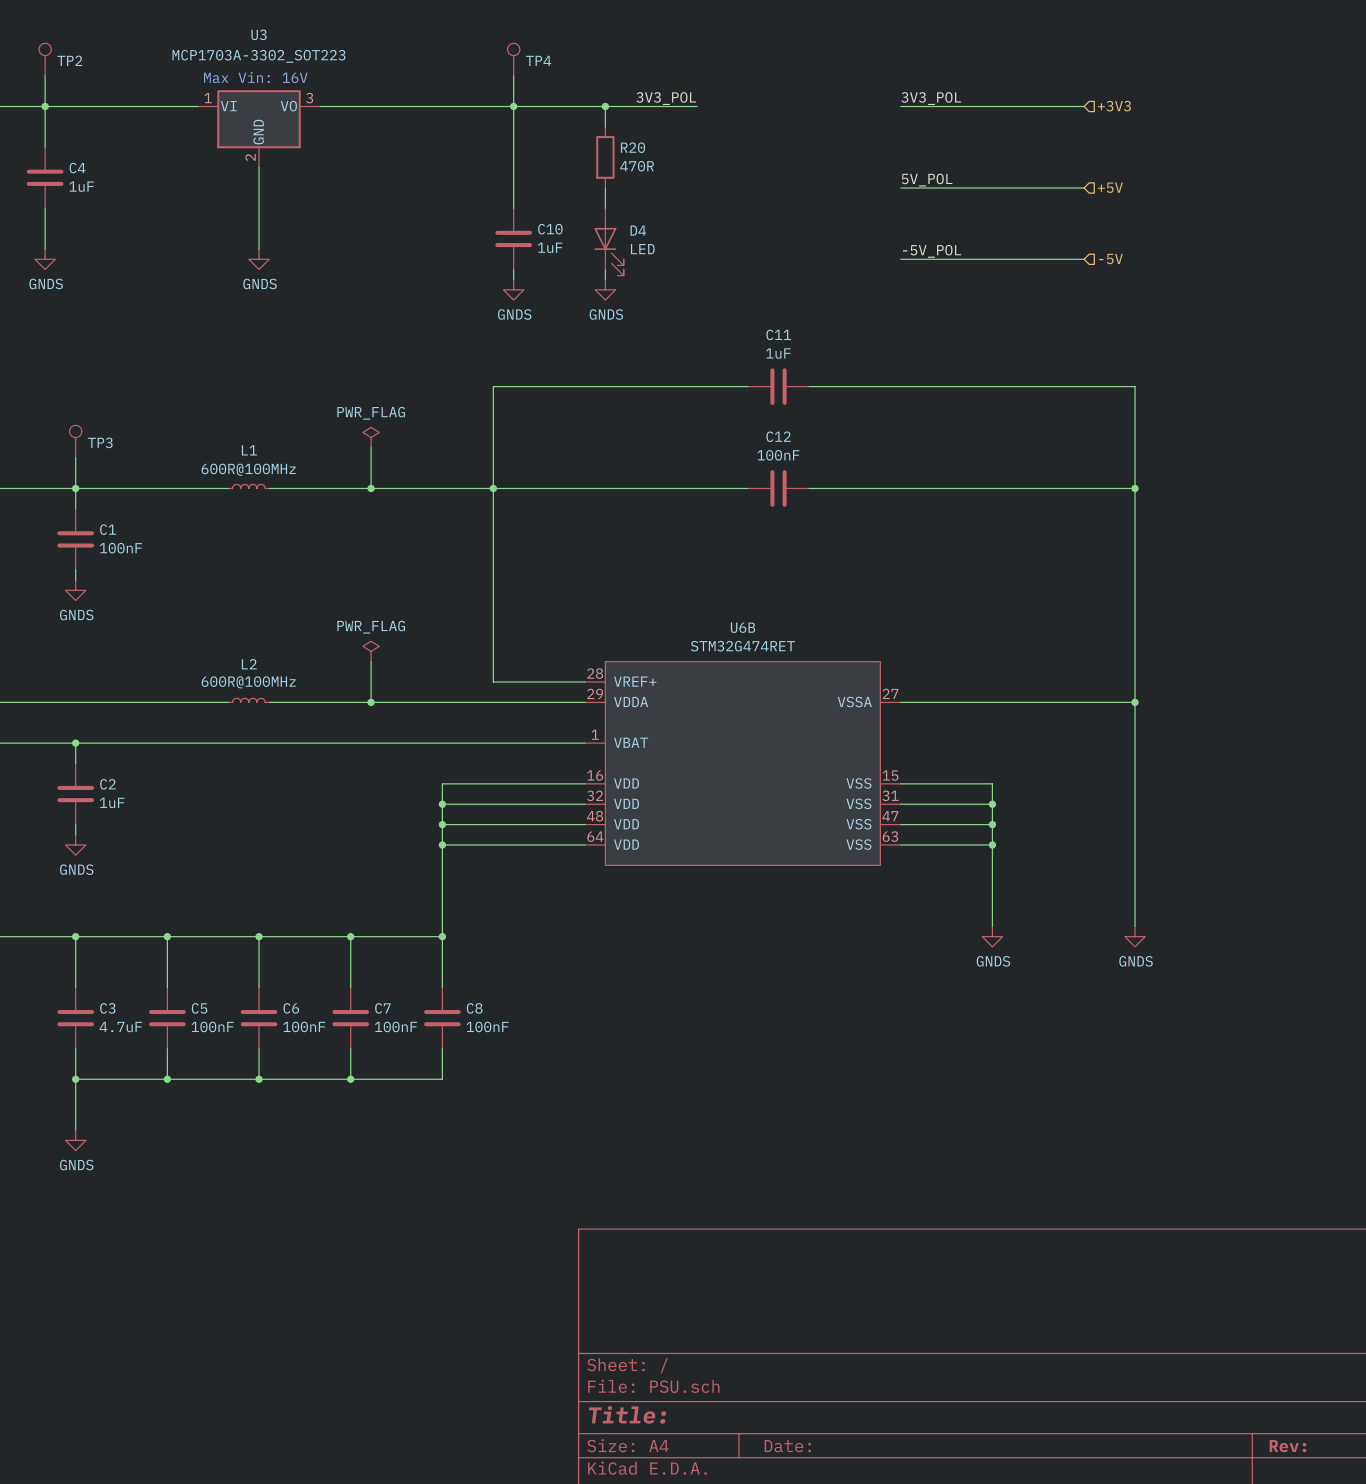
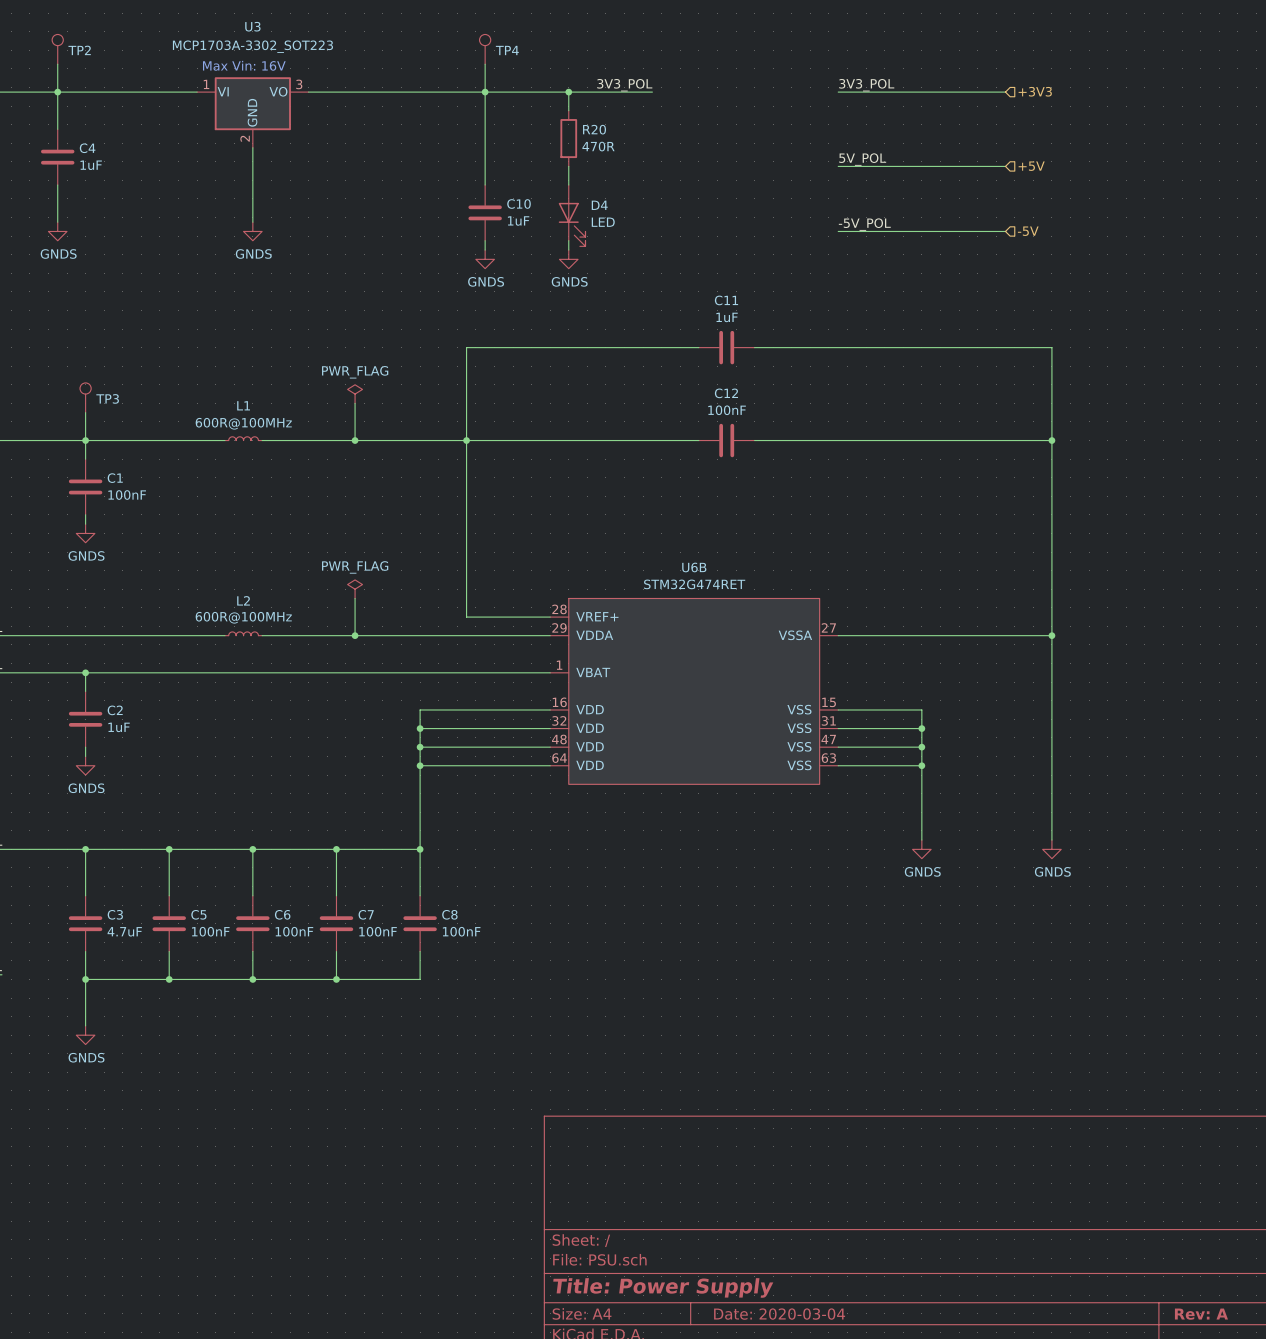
title block: Title: (627, 1414) -> Title: Power Supply (663, 1287)
title block: Date: (787, 1446) -> Date: 2020-03-04 (779, 1314)
title block: Rev: (1288, 1446) -> Rev: A (1201, 1314)

